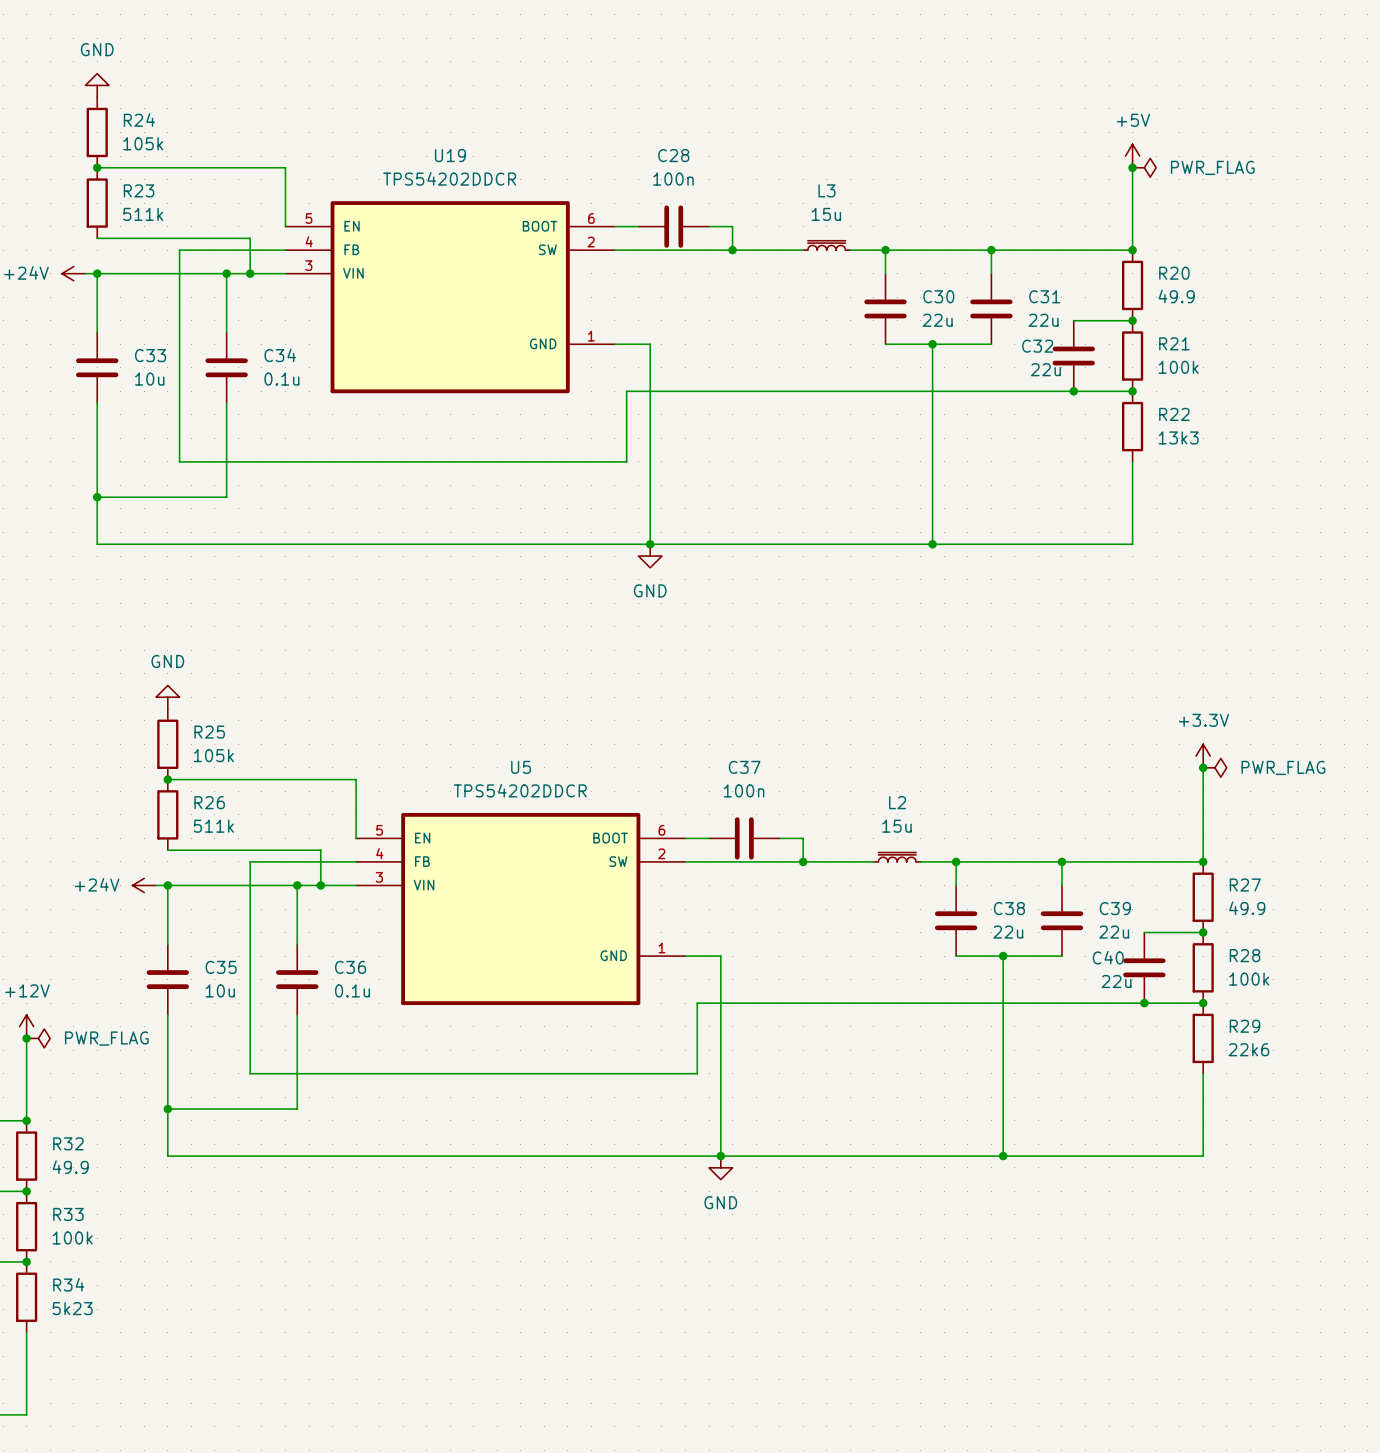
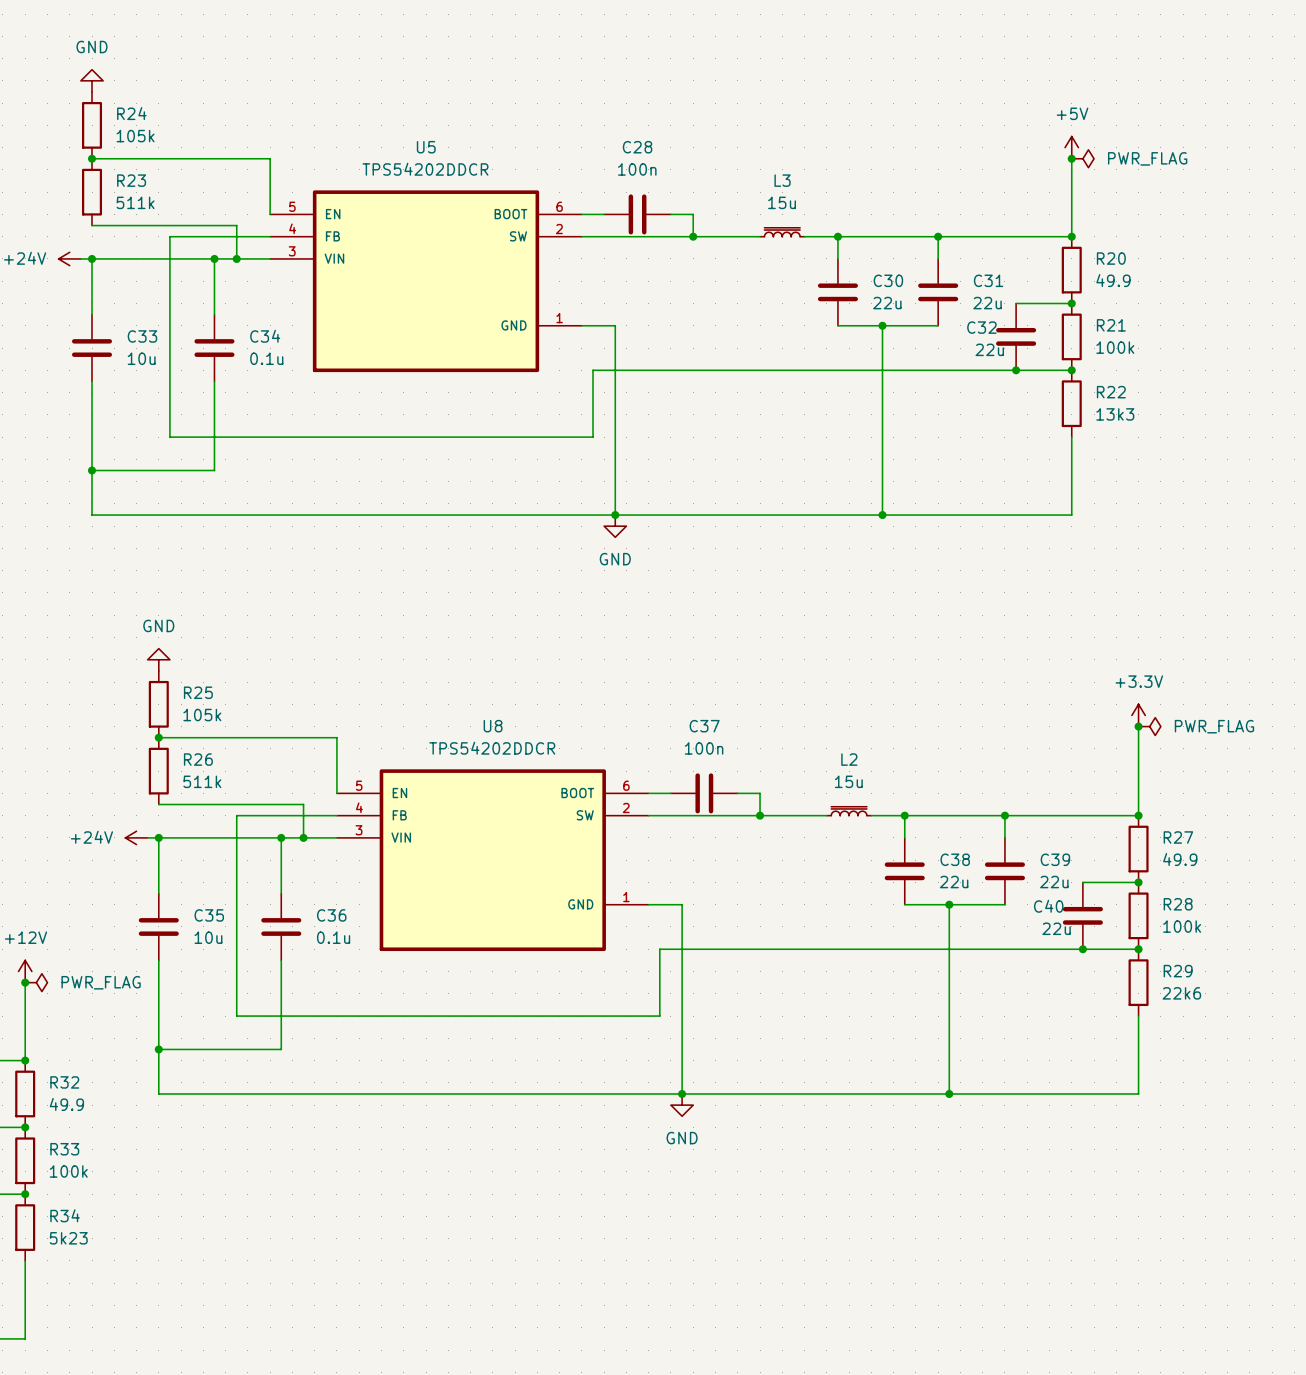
U19 name: U19 (450, 155) -> U5 (426, 147)
U5 name: U5 (521, 767) -> U8 (493, 726)

